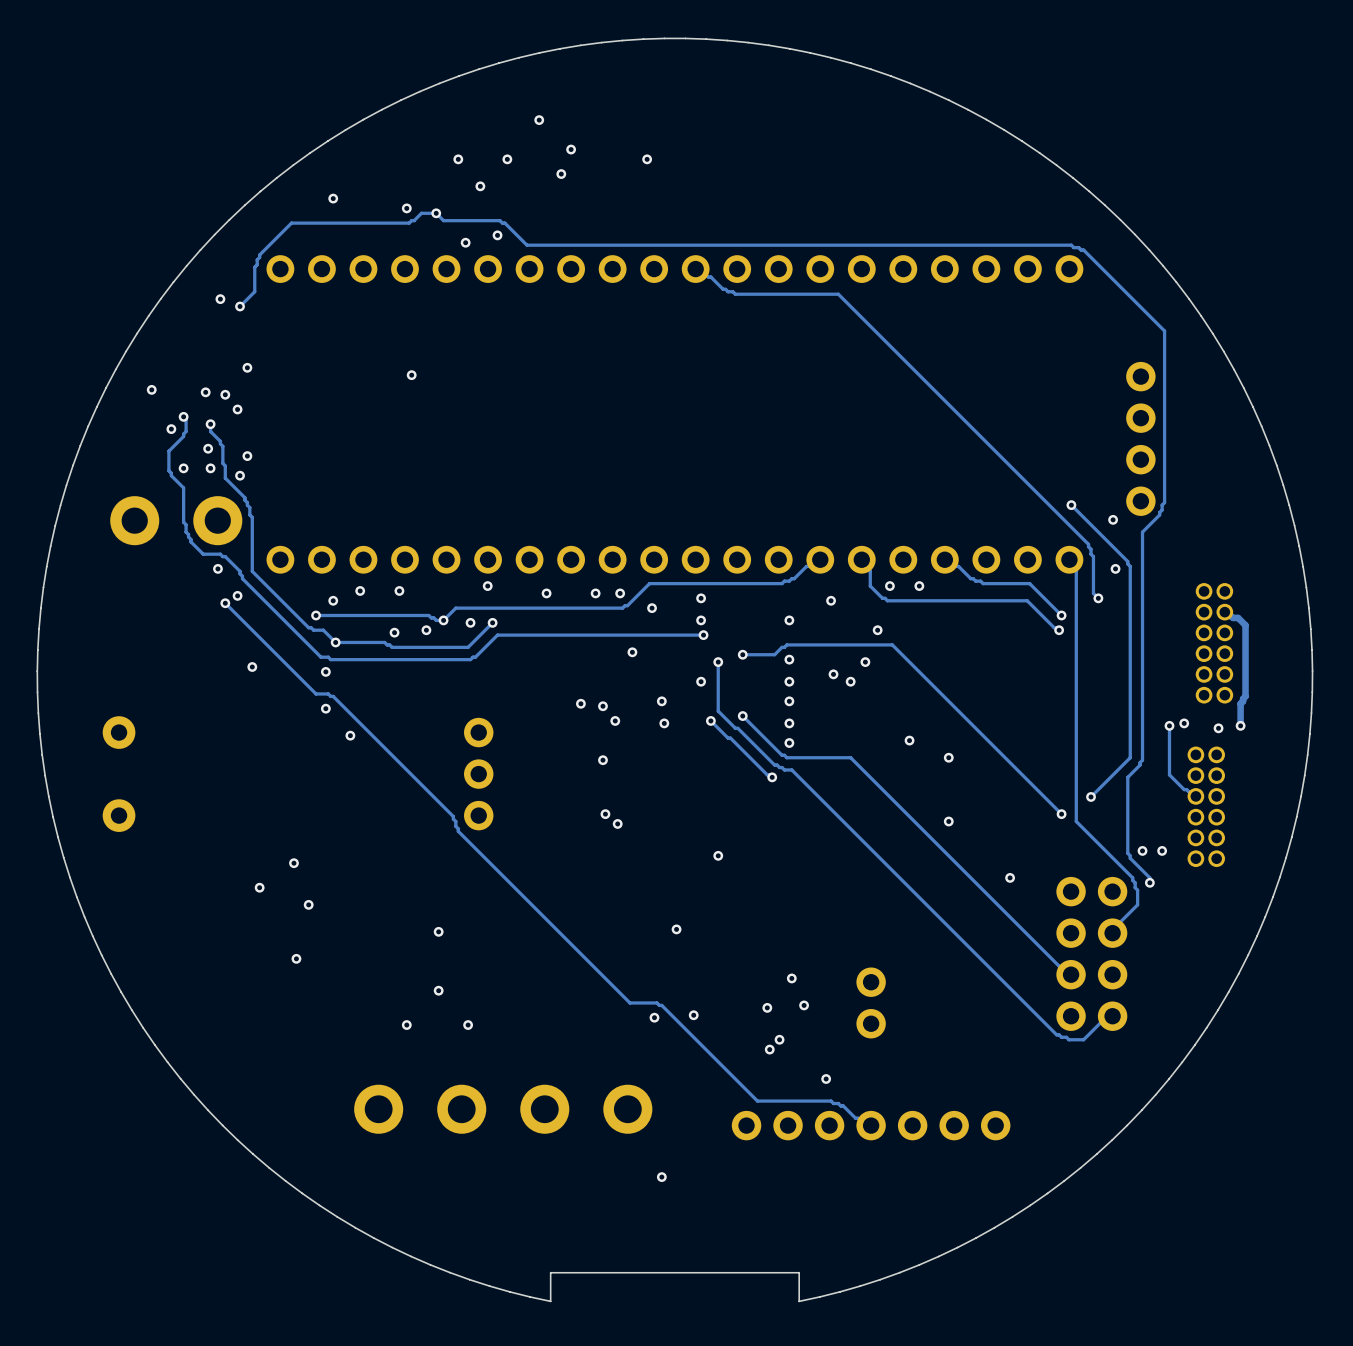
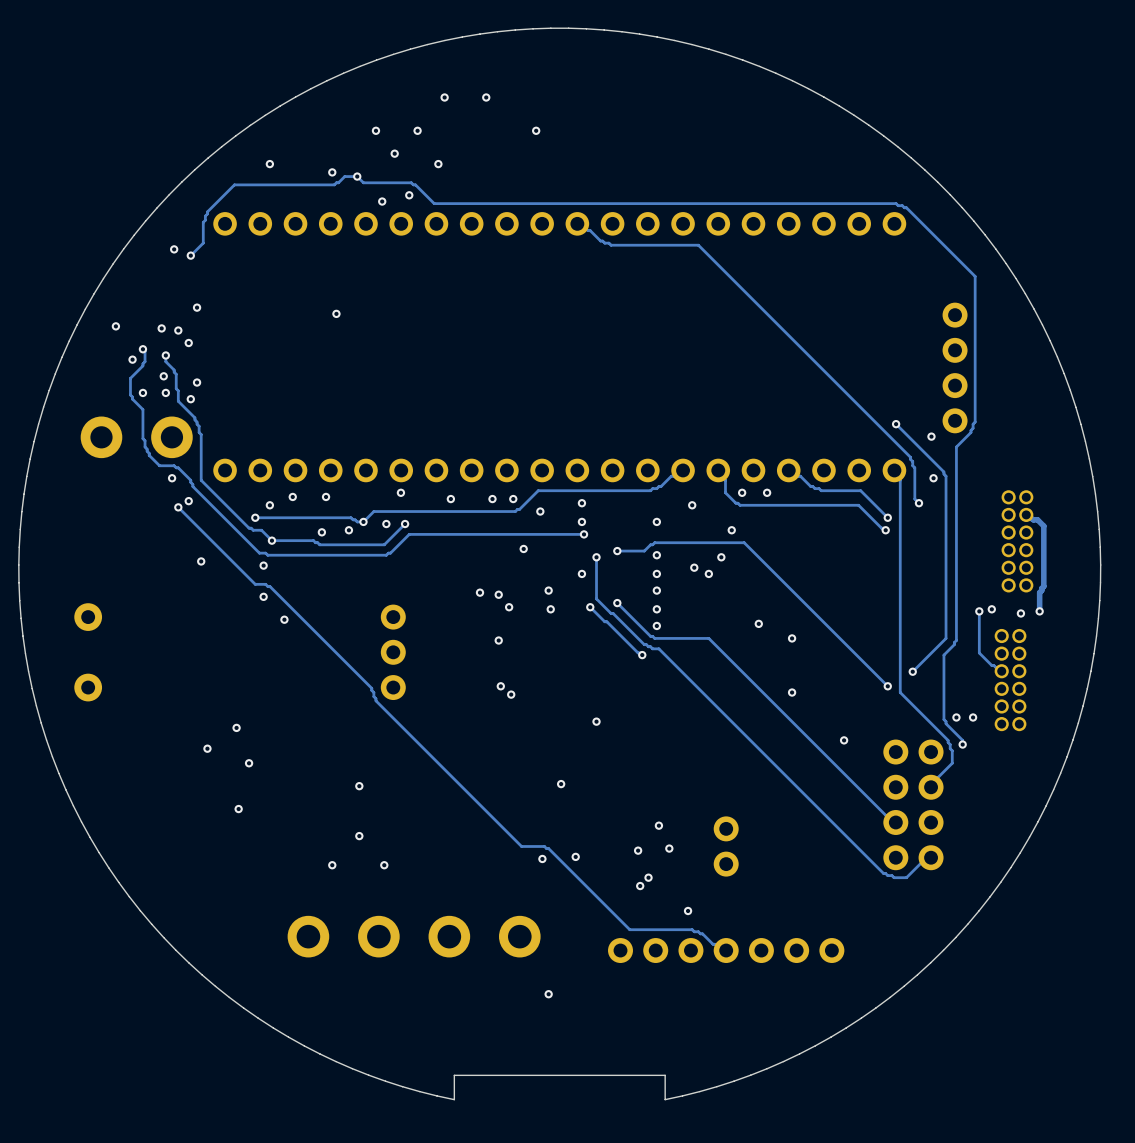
via: none -> (486, 97)
via: (571, 149) -> none
via: (561, 174) -> none
via: none -> (438, 164)

